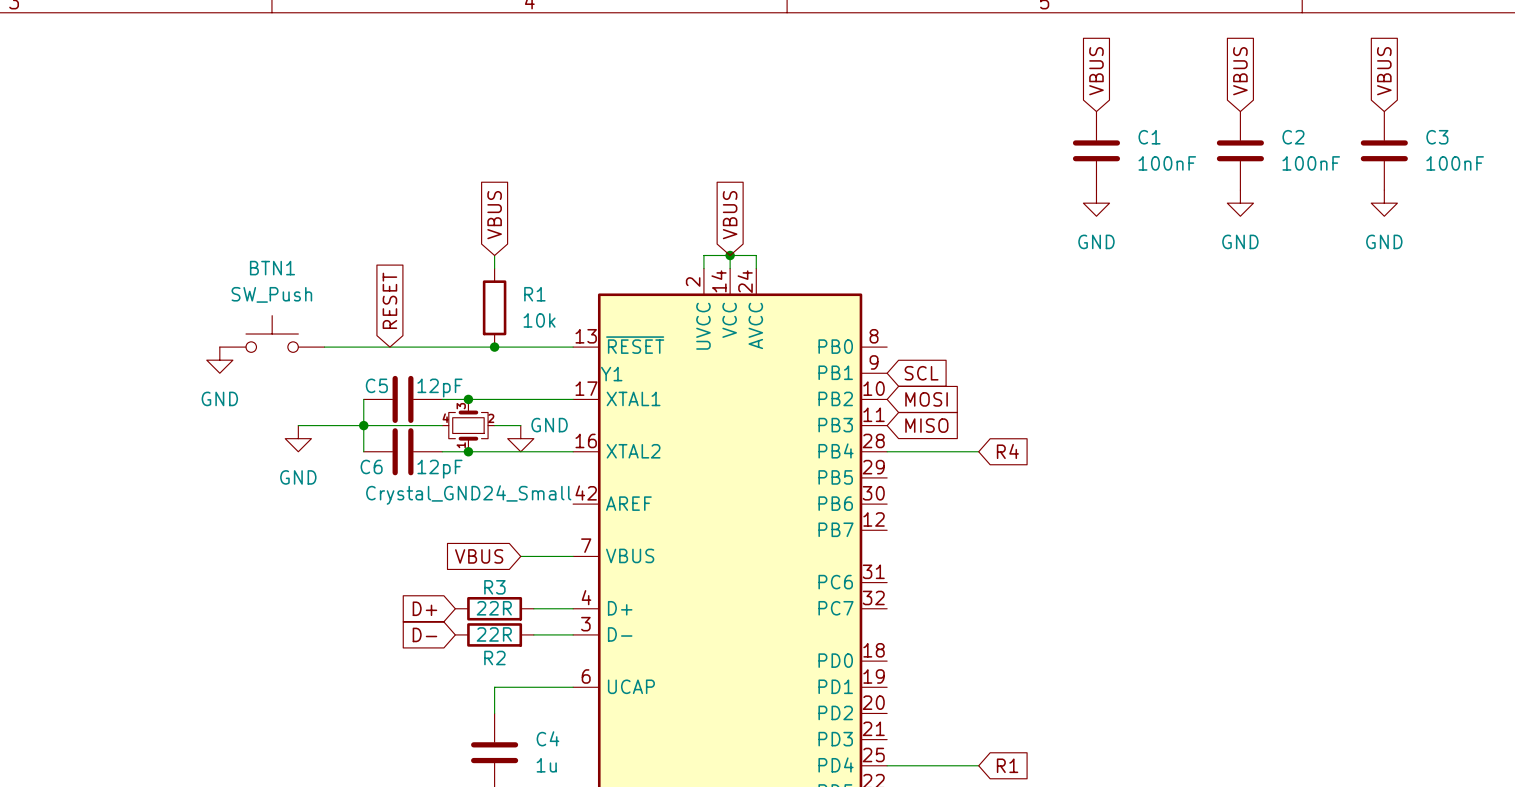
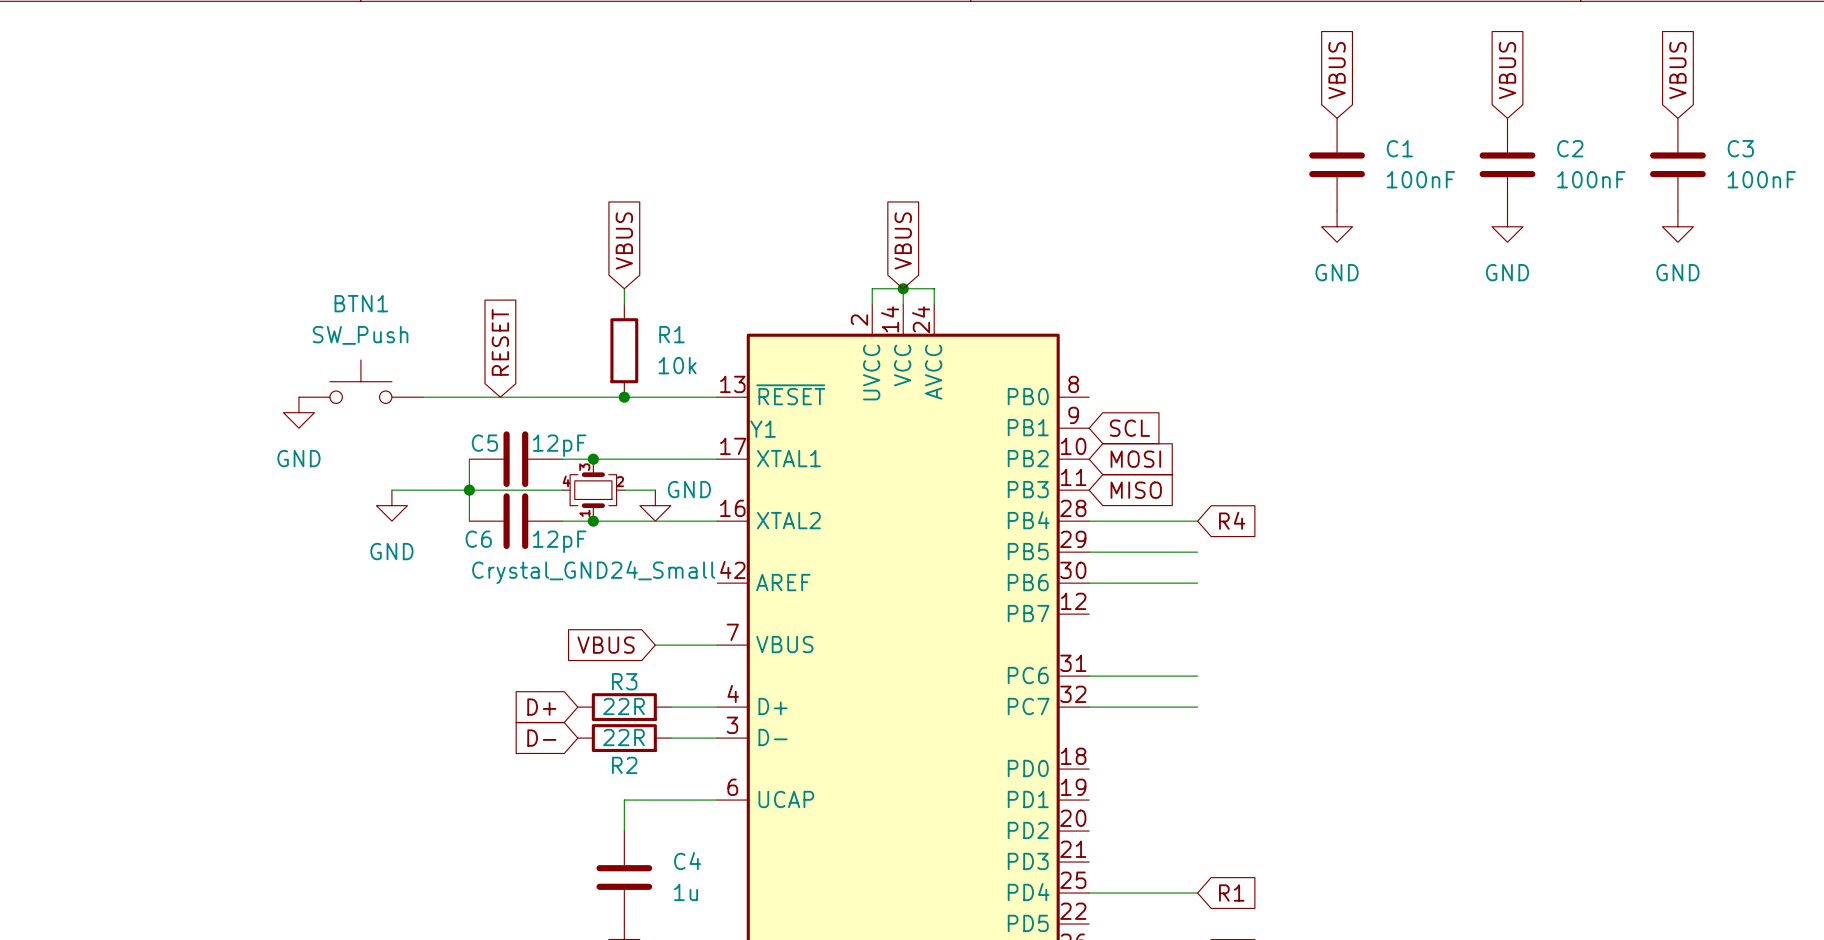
wire: none -> (1089, 552) (1197, 552)
wire: none -> (1089, 583) (1197, 583)
wire: none -> (1089, 676) (1197, 676)
wire: none -> (1089, 707) (1197, 707)

